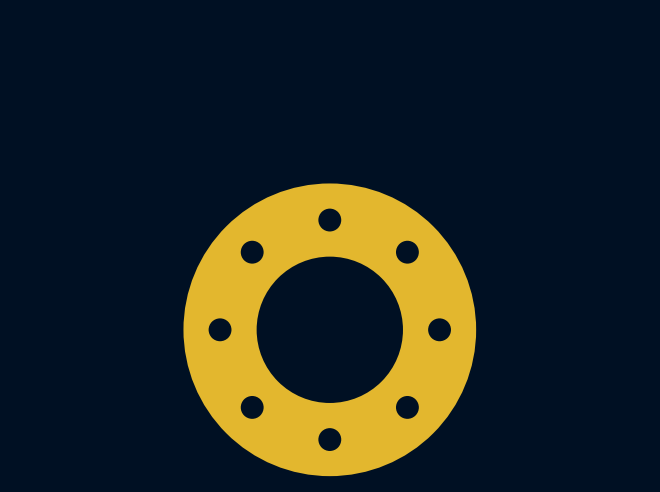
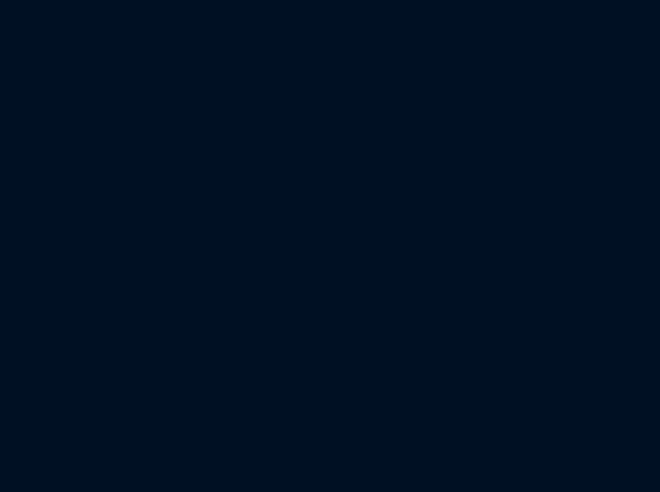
part: (329, 329) -> none

